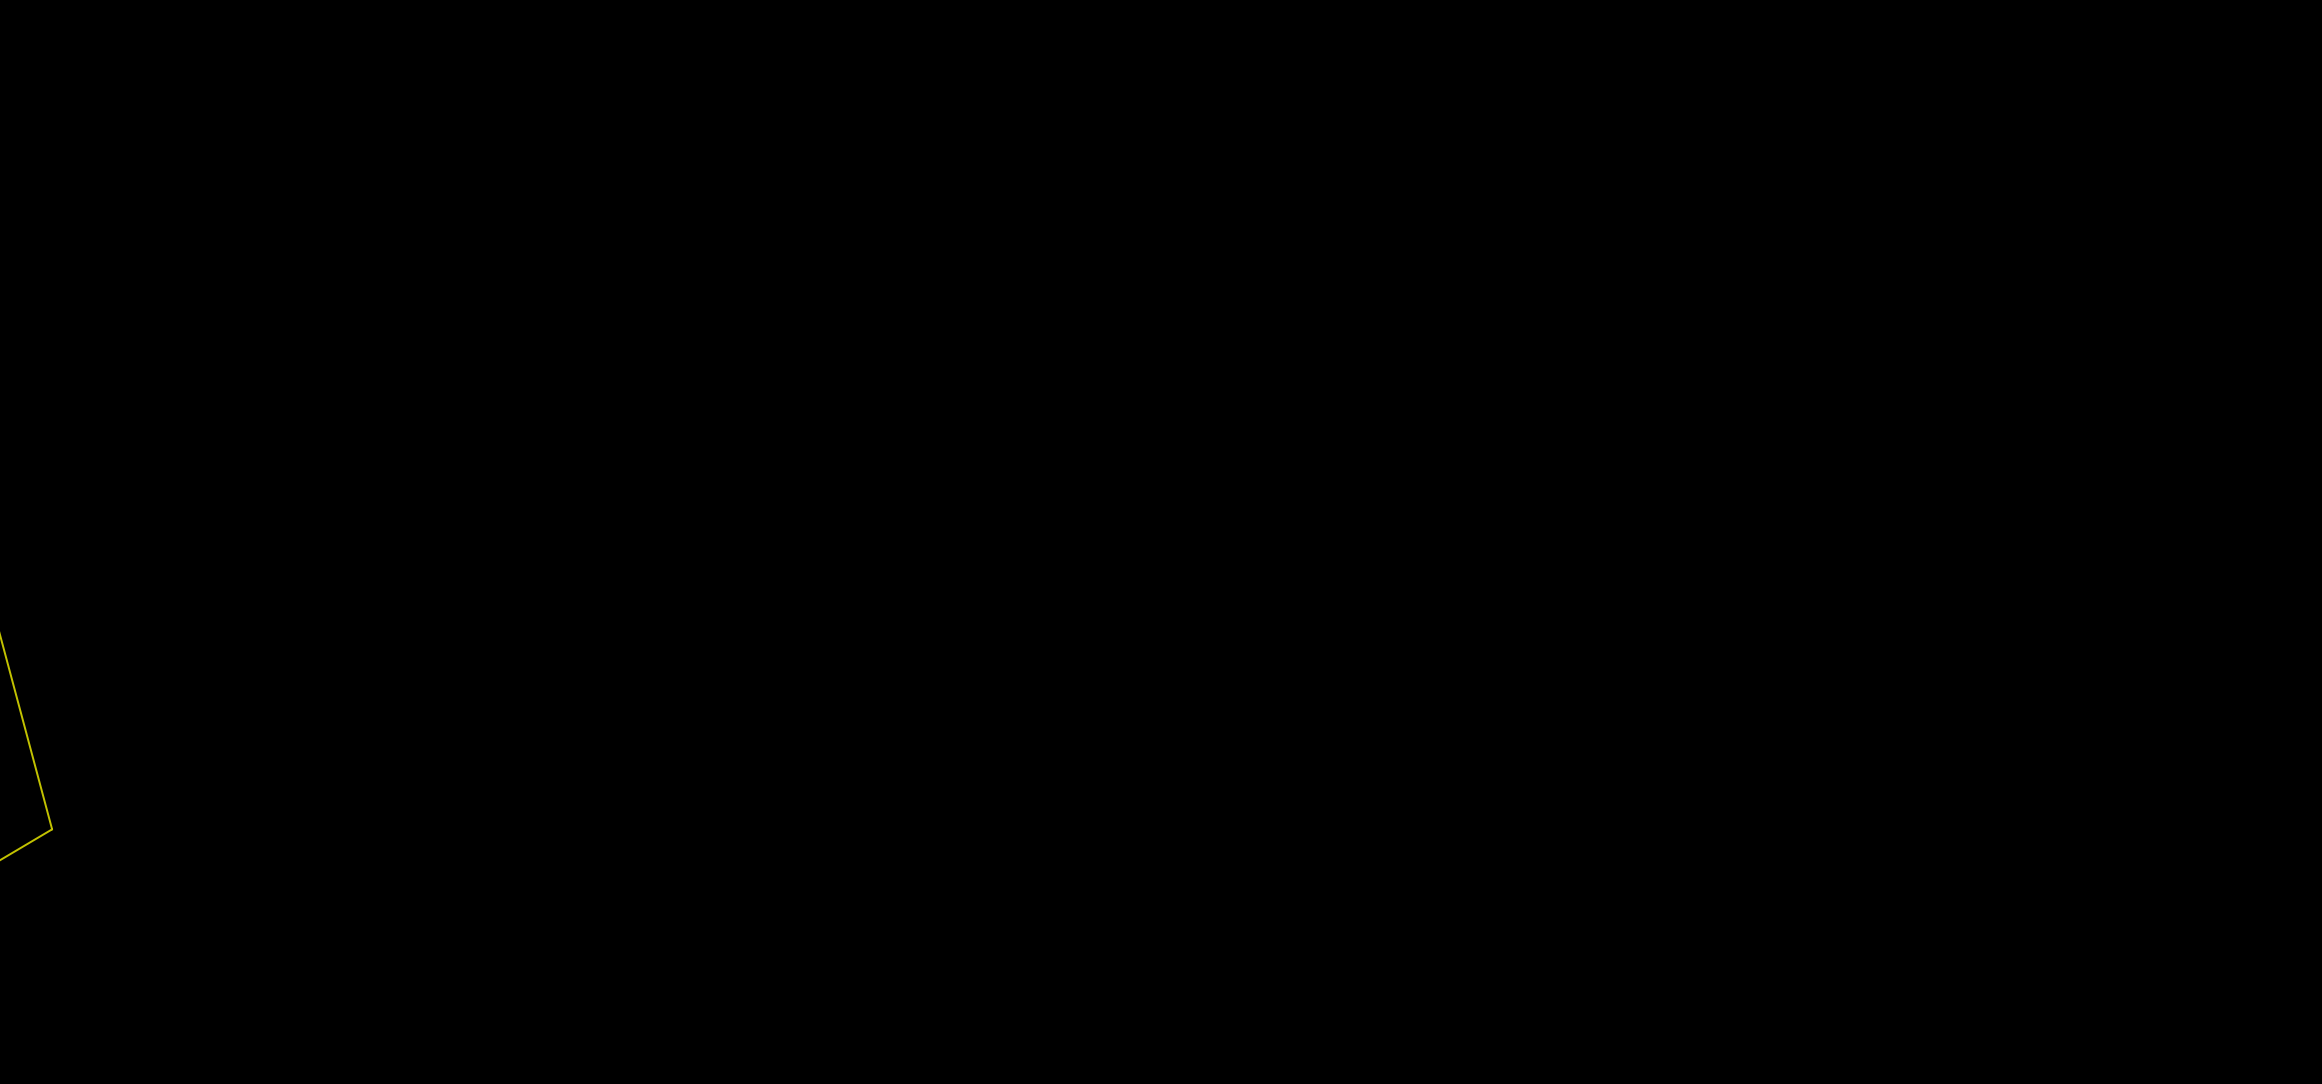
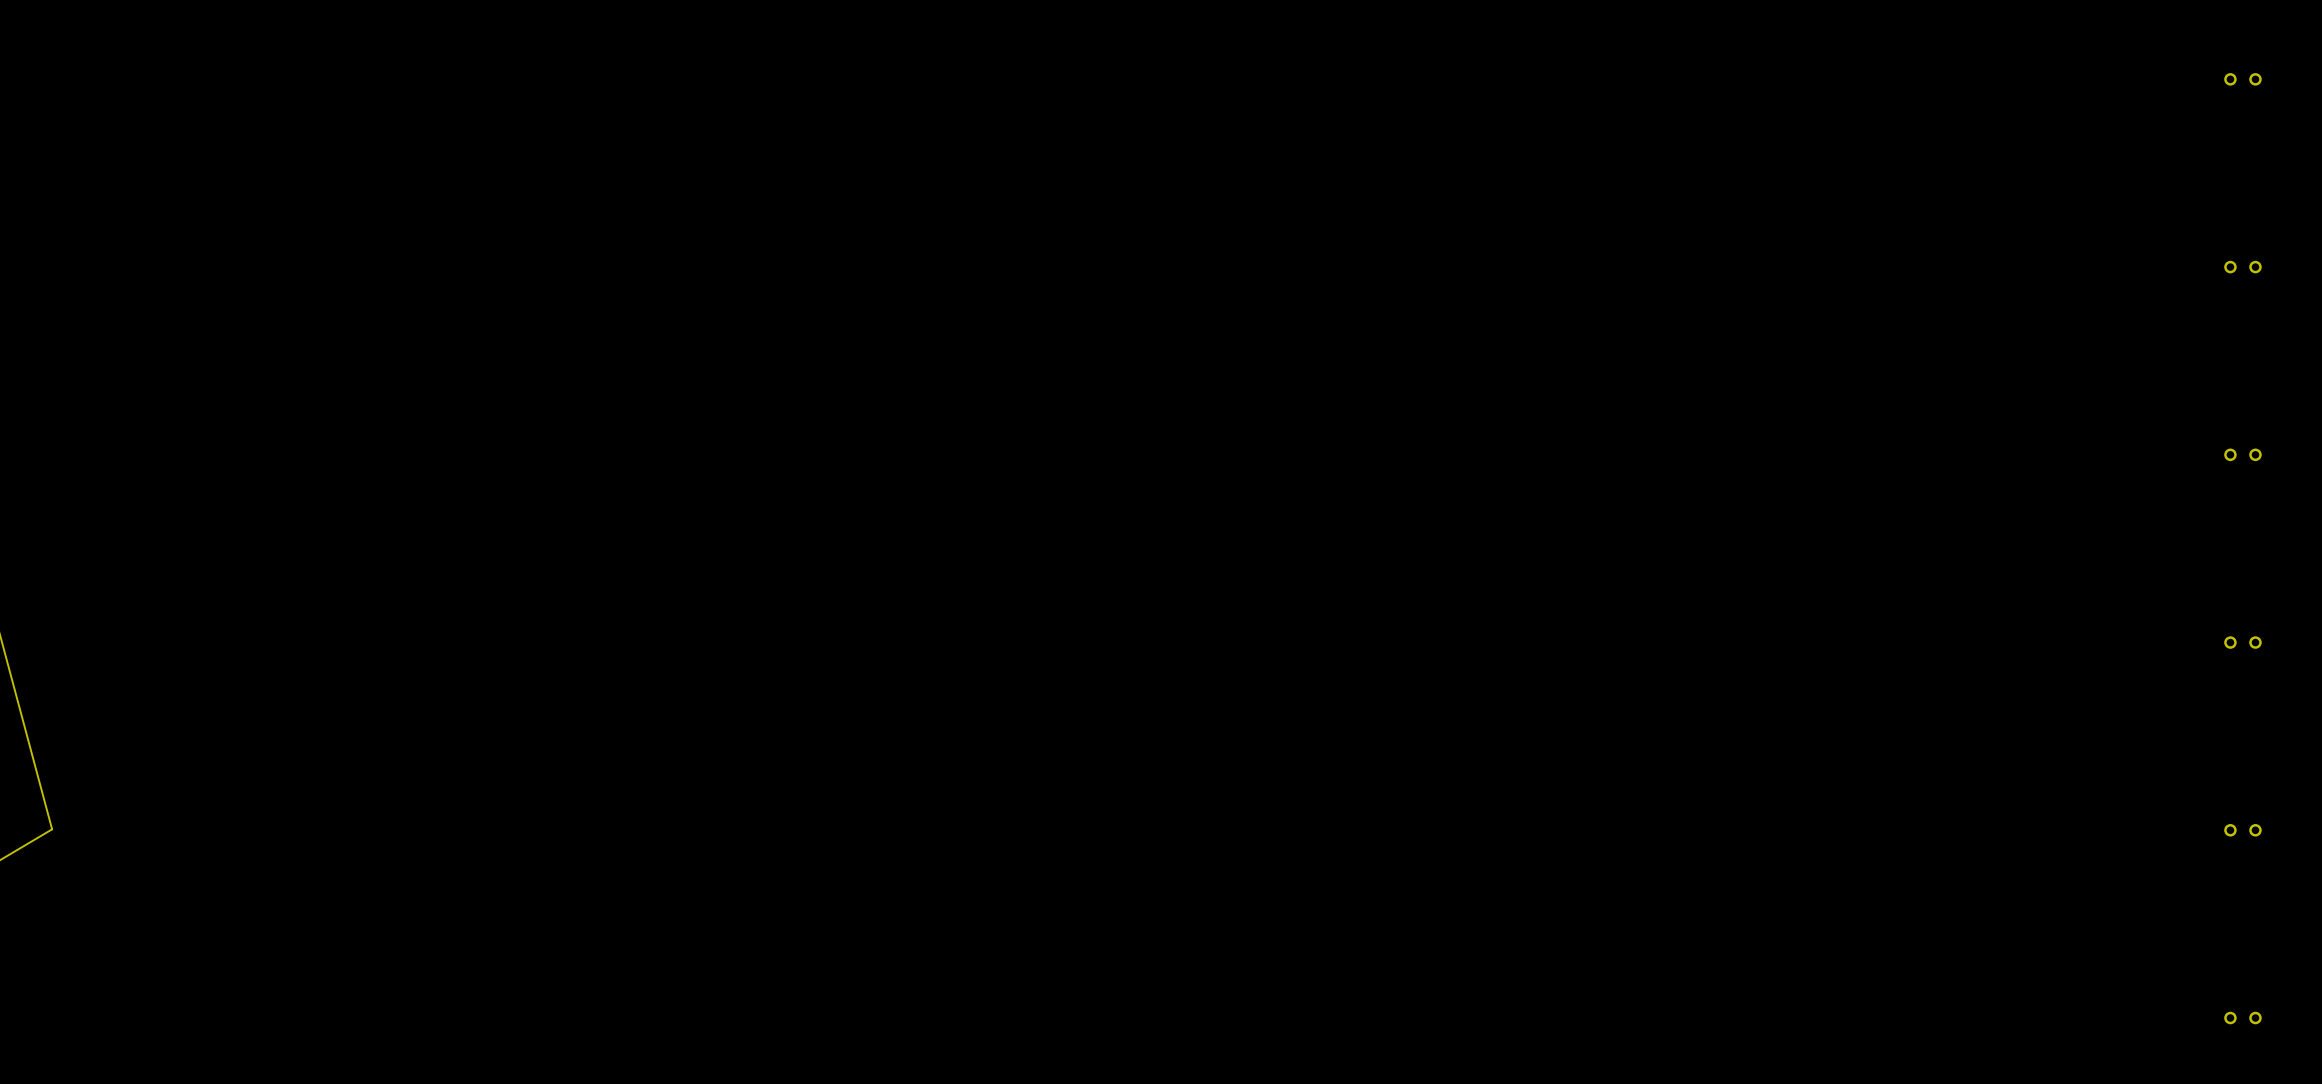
part: none -> (2242, 79)
part: none -> (2242, 267)
part: none -> (2242, 454)
part: none -> (2242, 642)
part: none -> (2242, 830)
part: none -> (2242, 1018)

